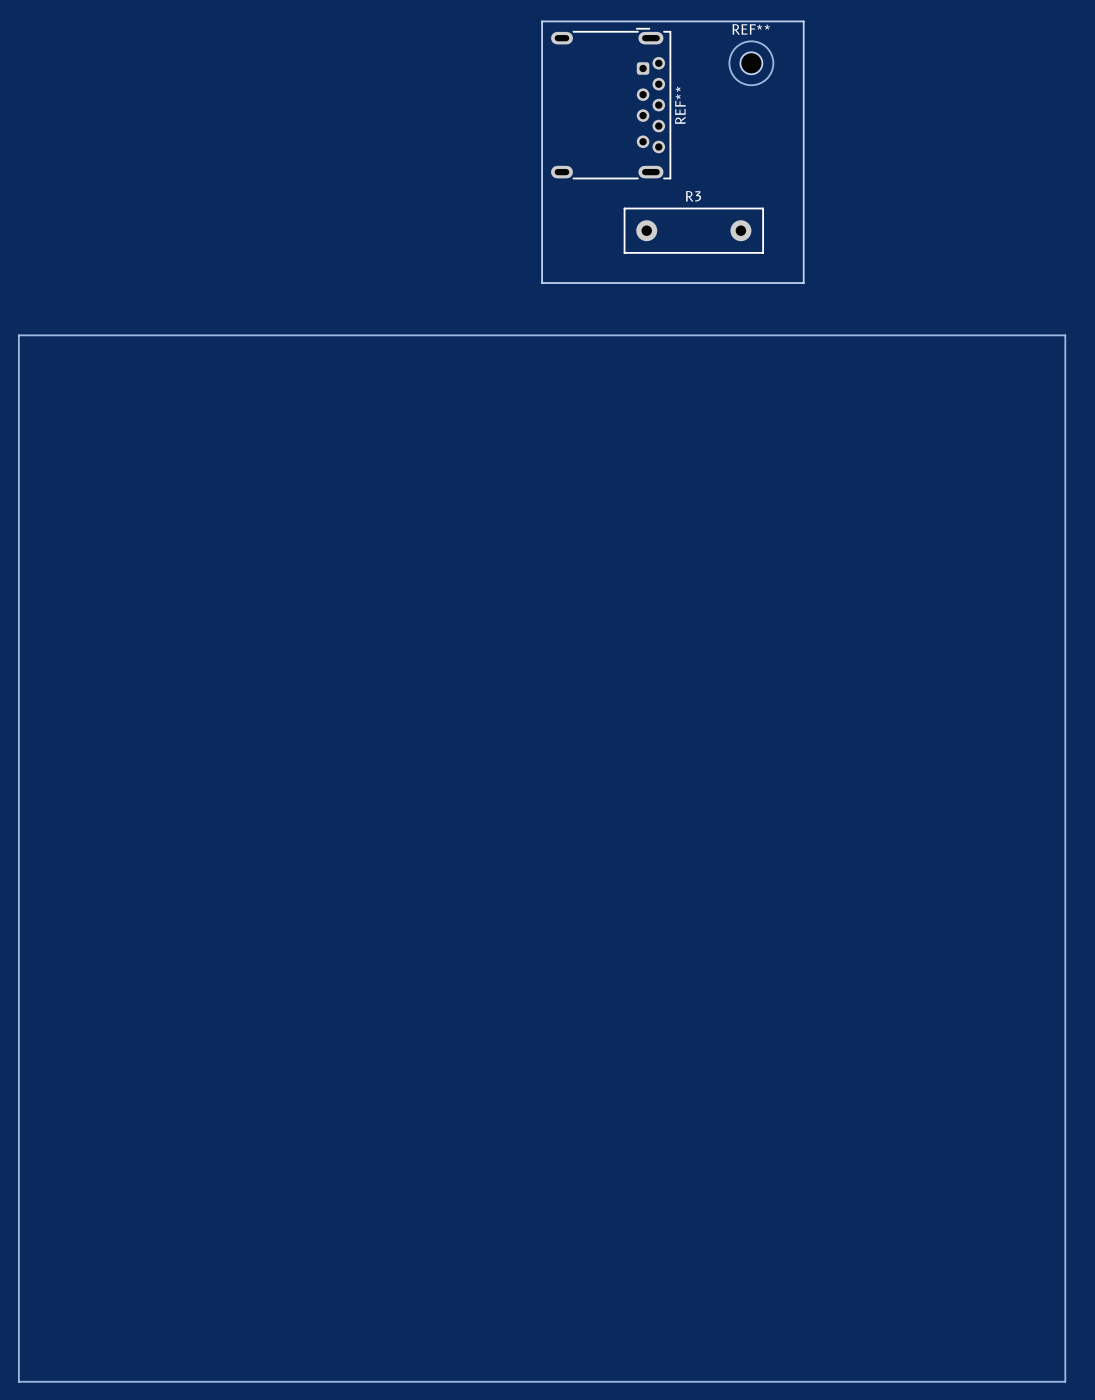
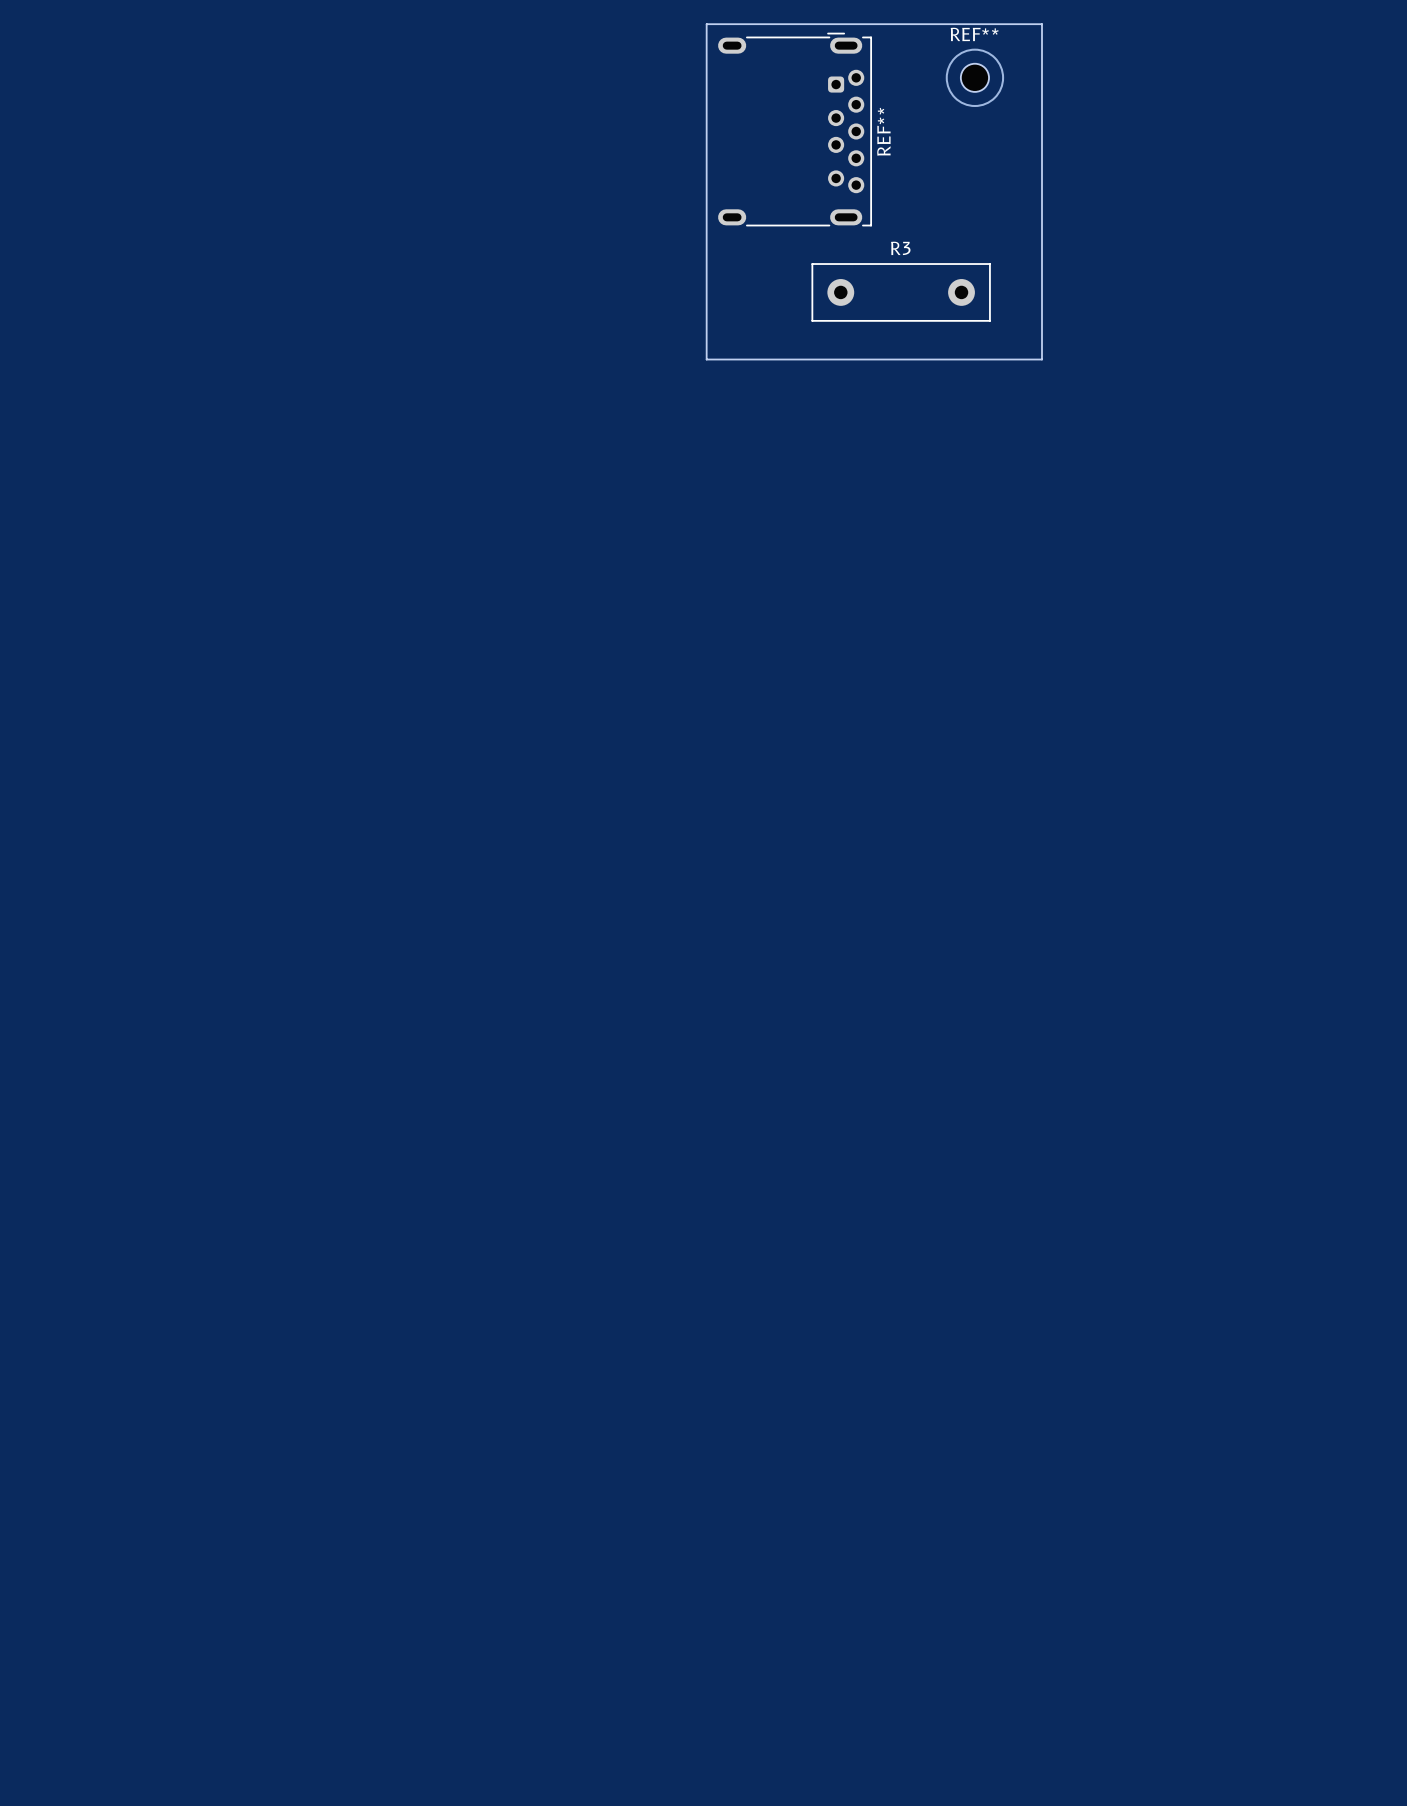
line: (18, 335) (1065, 335) (1065, 1381) (18, 1381) (18, 335) -> none

